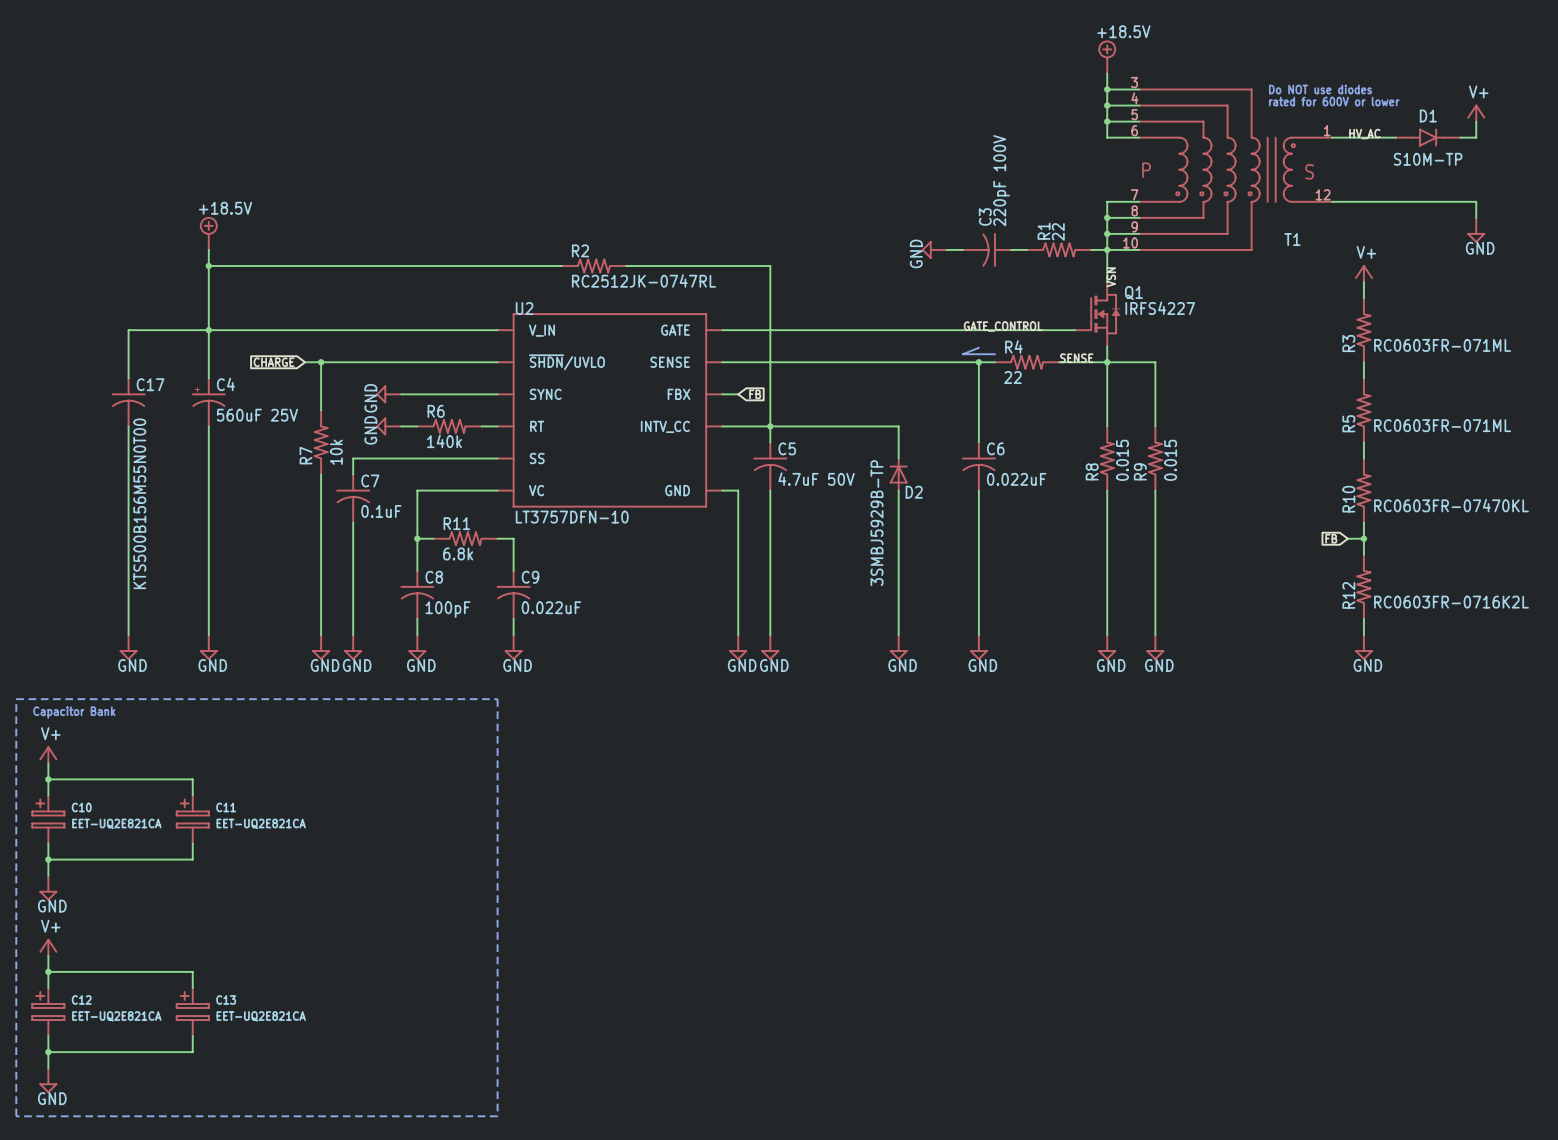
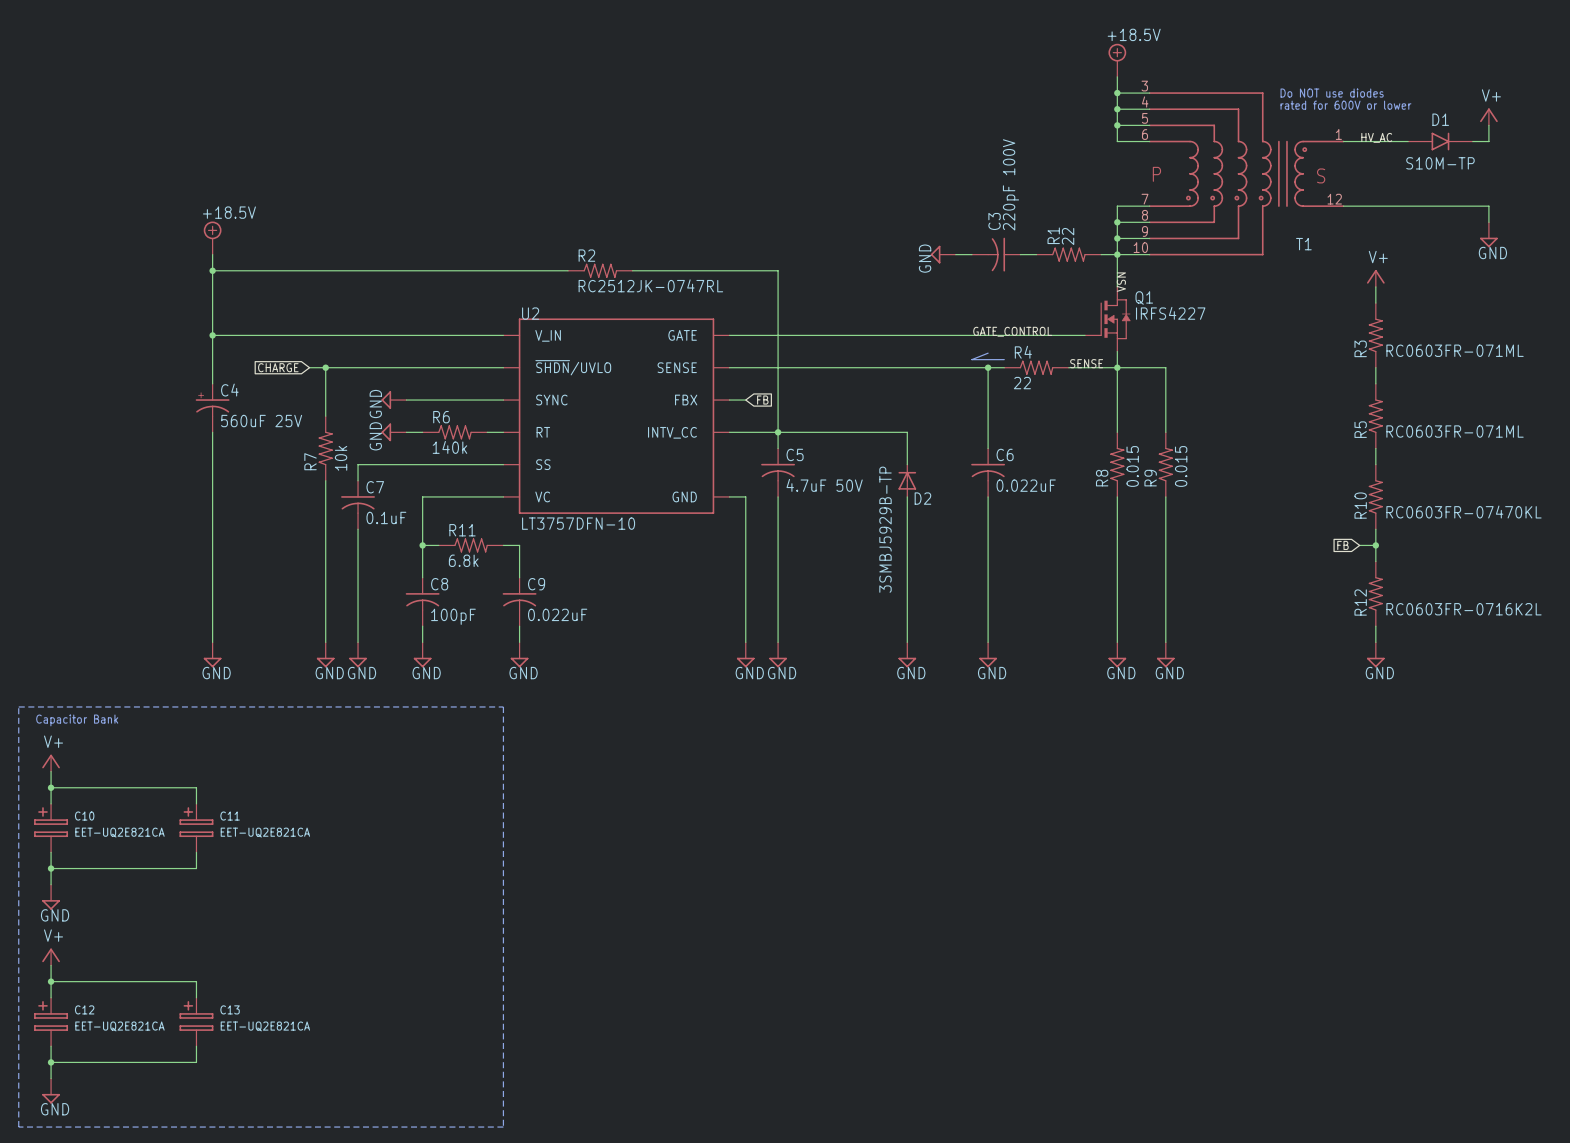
wire: (208, 330) (128, 330) (128, 378) -> none
C17: KTS500B156M55N0T00 (128, 402) -> none
wire: (128, 426) (128, 634) -> none
power symbol: GND (128, 647) -> none

